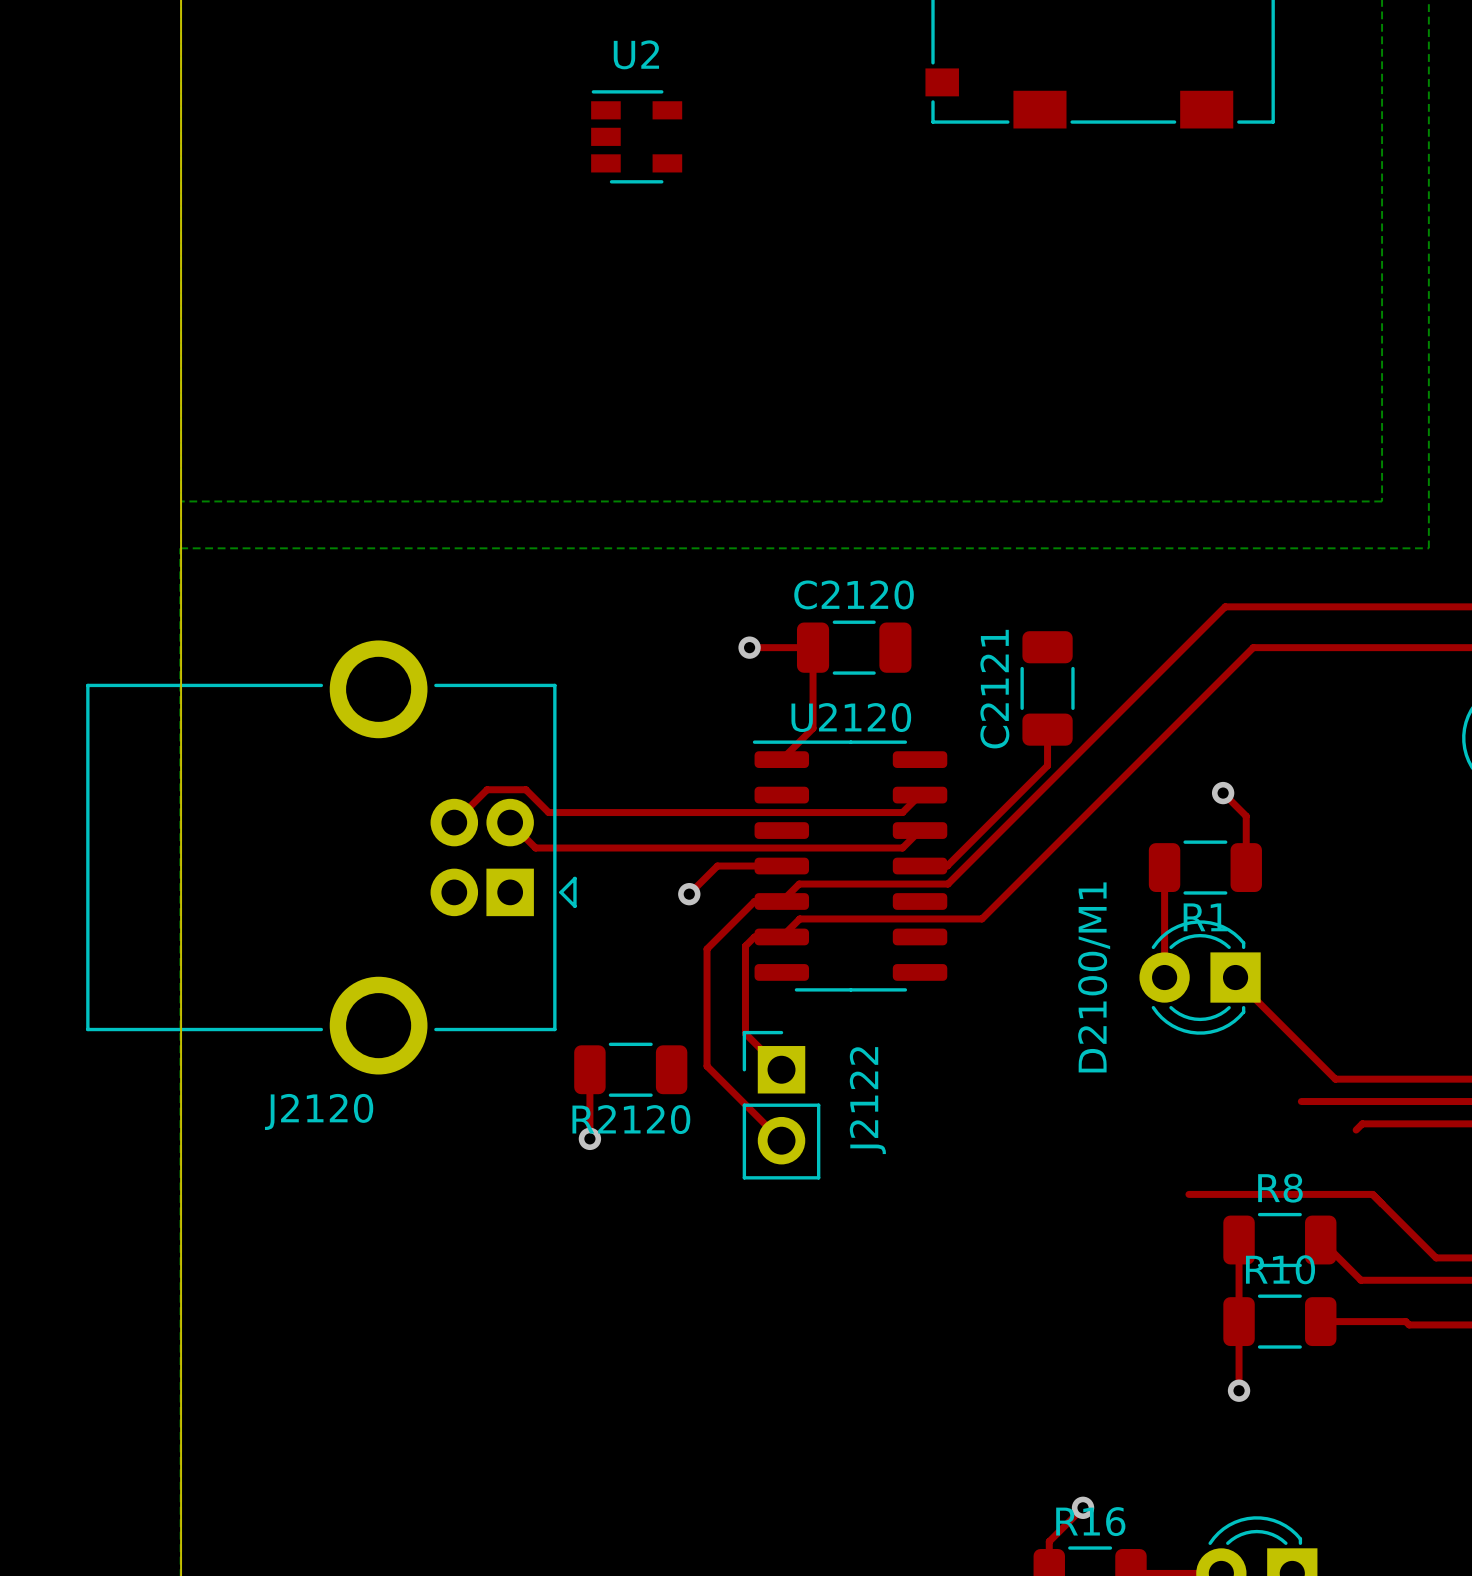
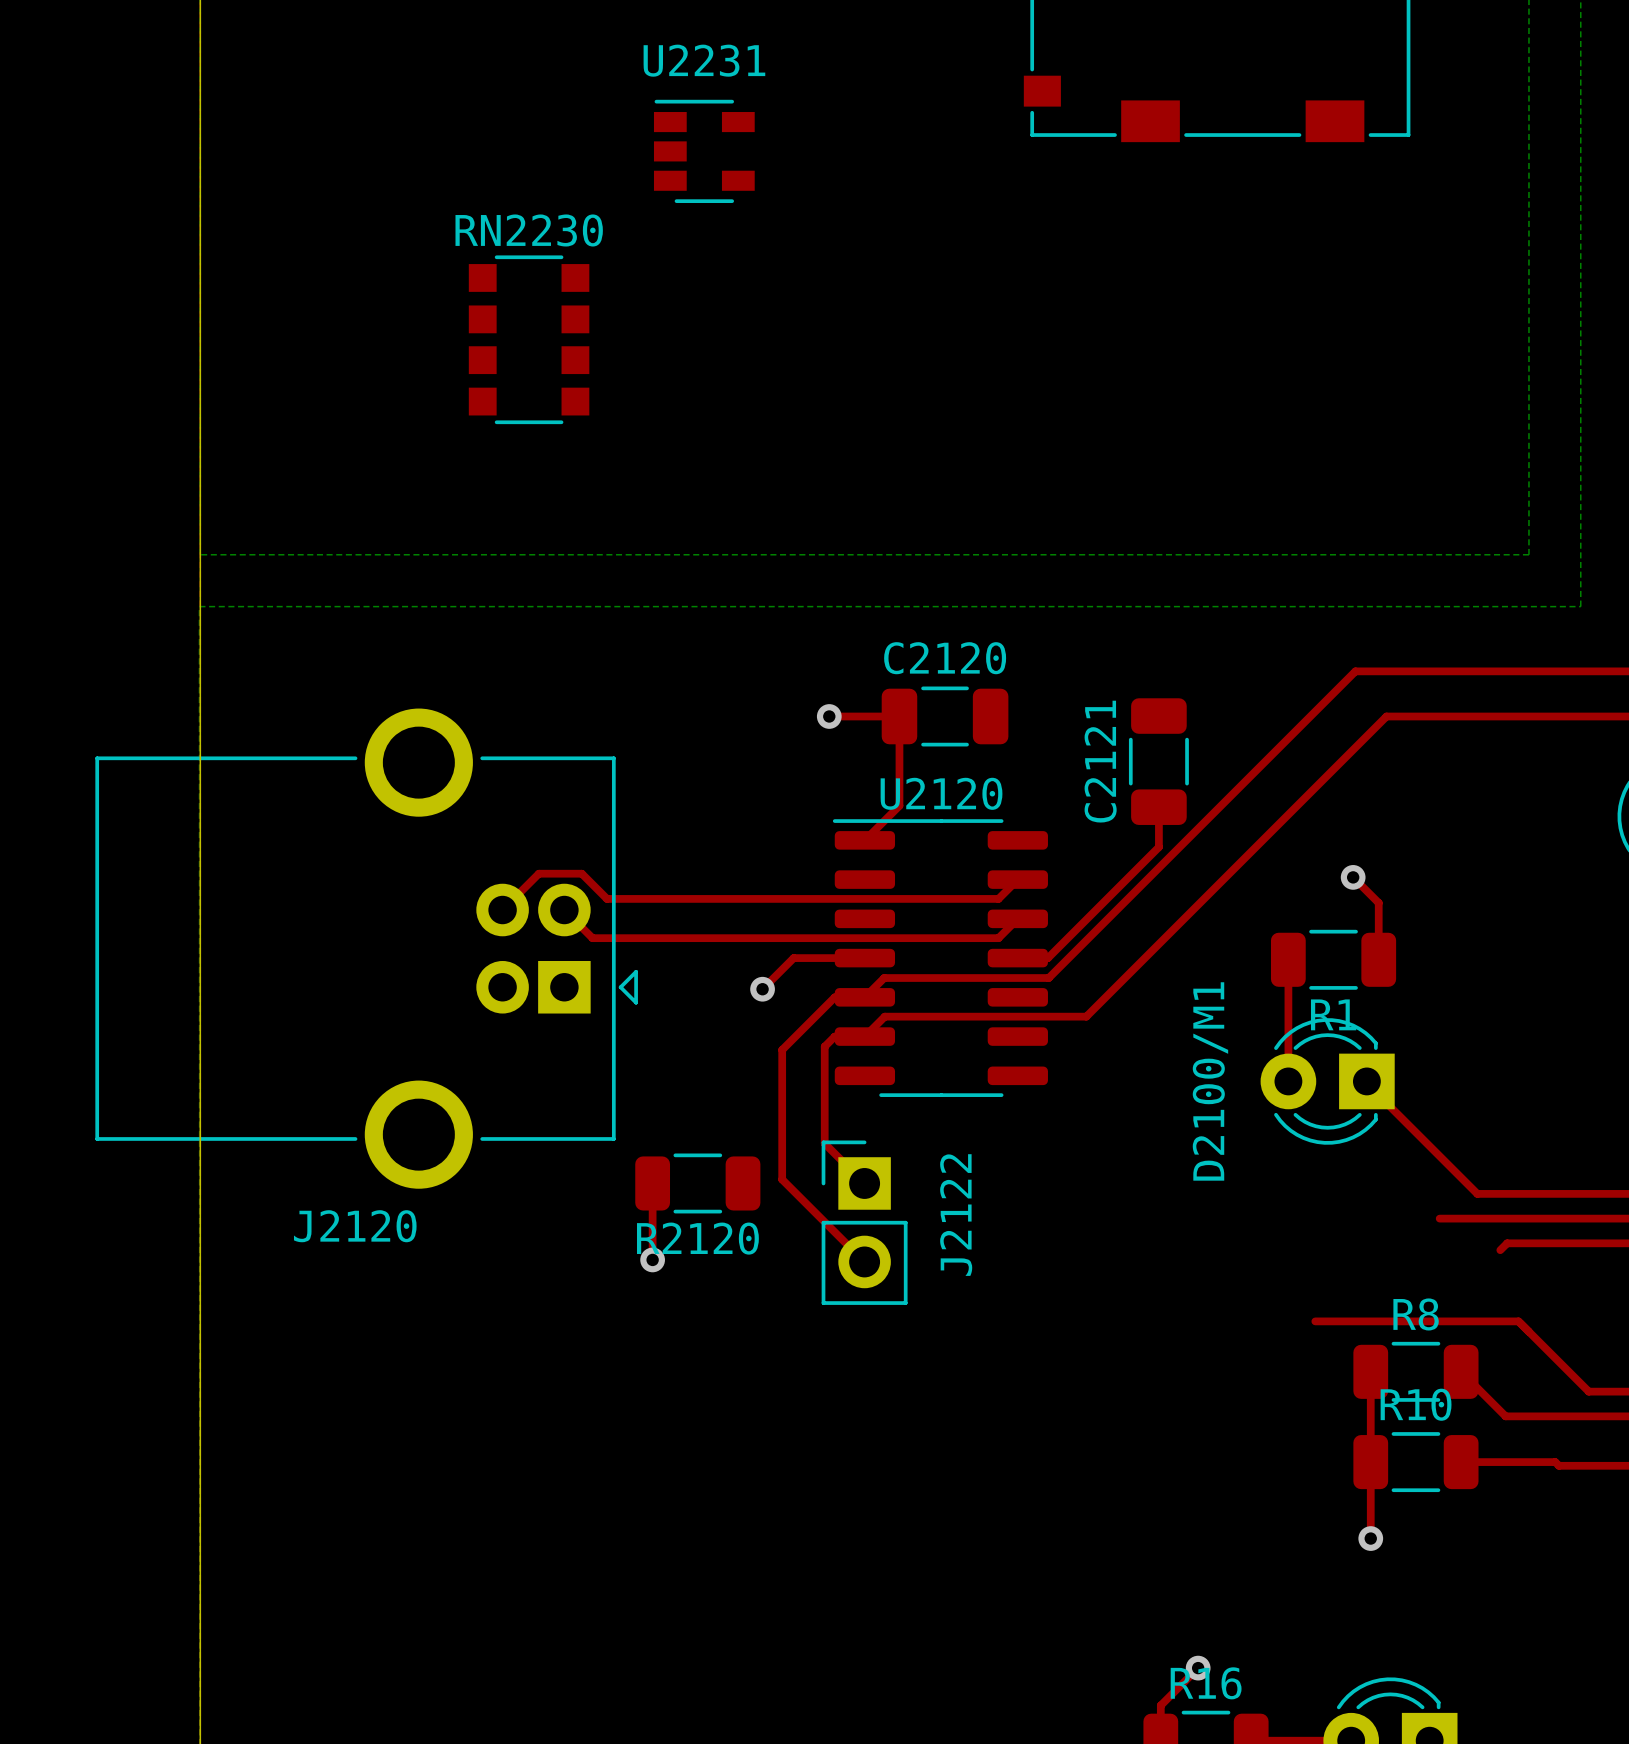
U2 name: U2 (636, 54) -> U2231 (704, 60)
RN2230: none -> (529, 339)

